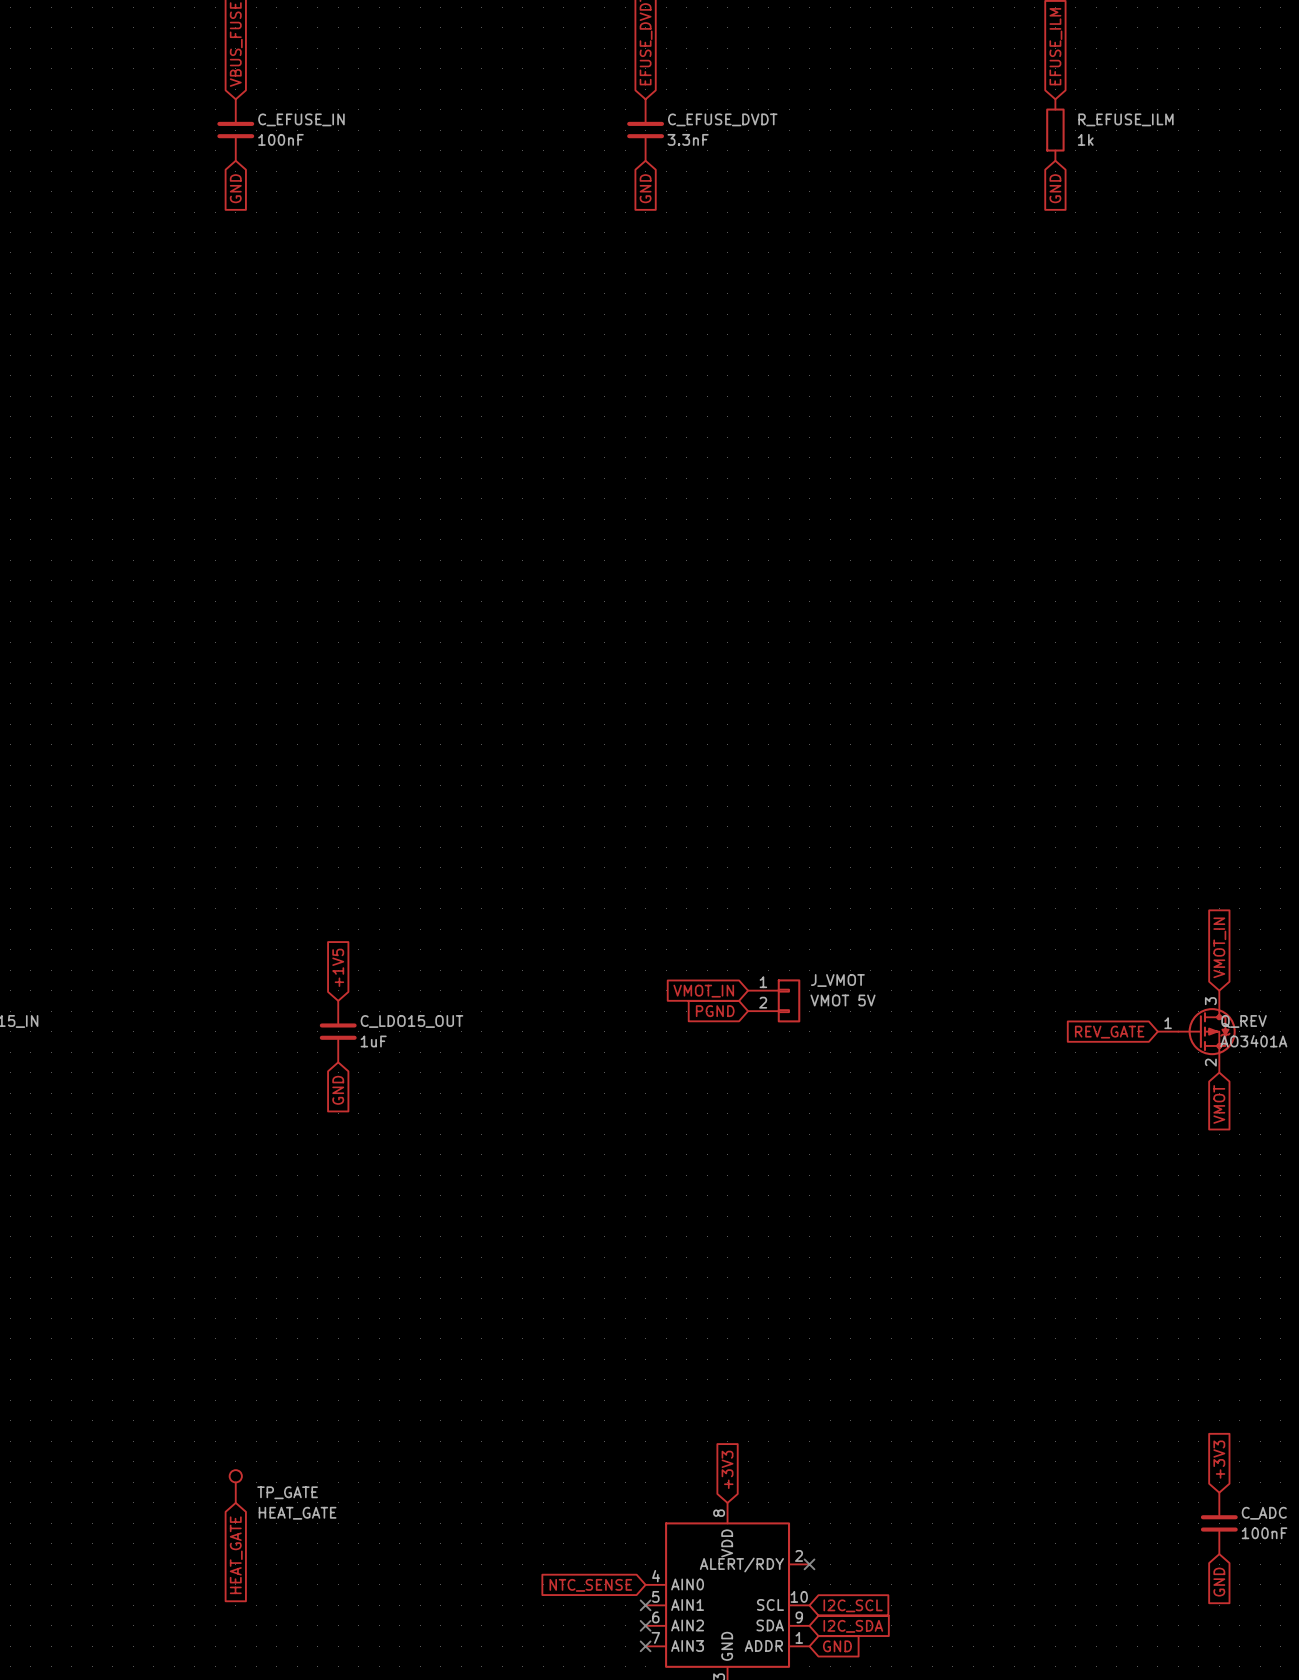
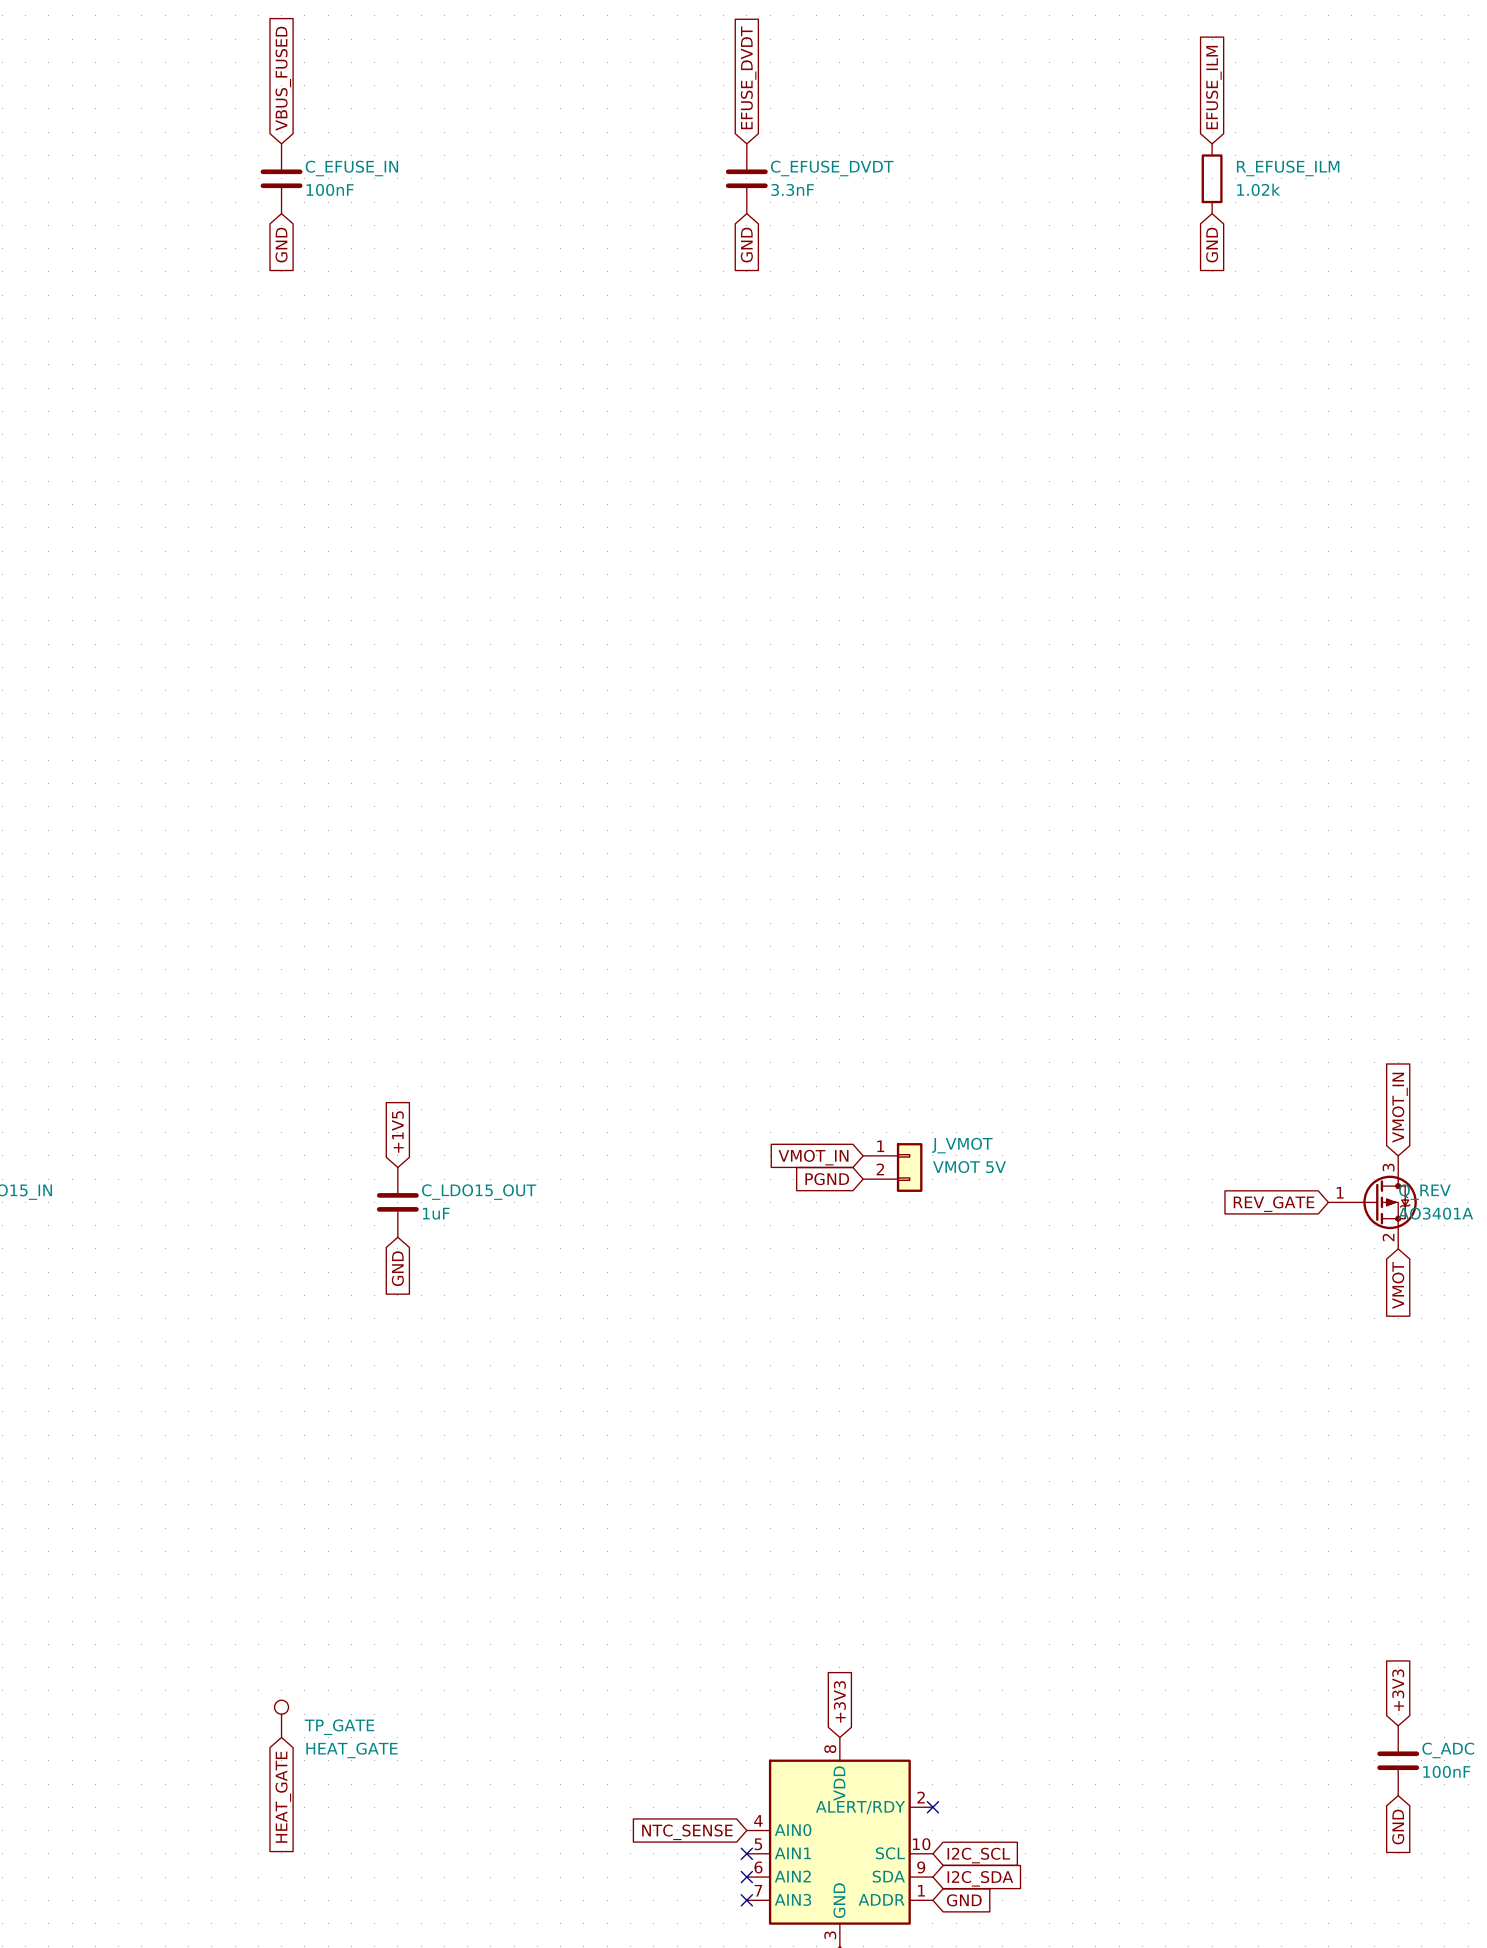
R_EFUSE_ILM value: 1k (1085, 139) -> 1.02k (1258, 189)

